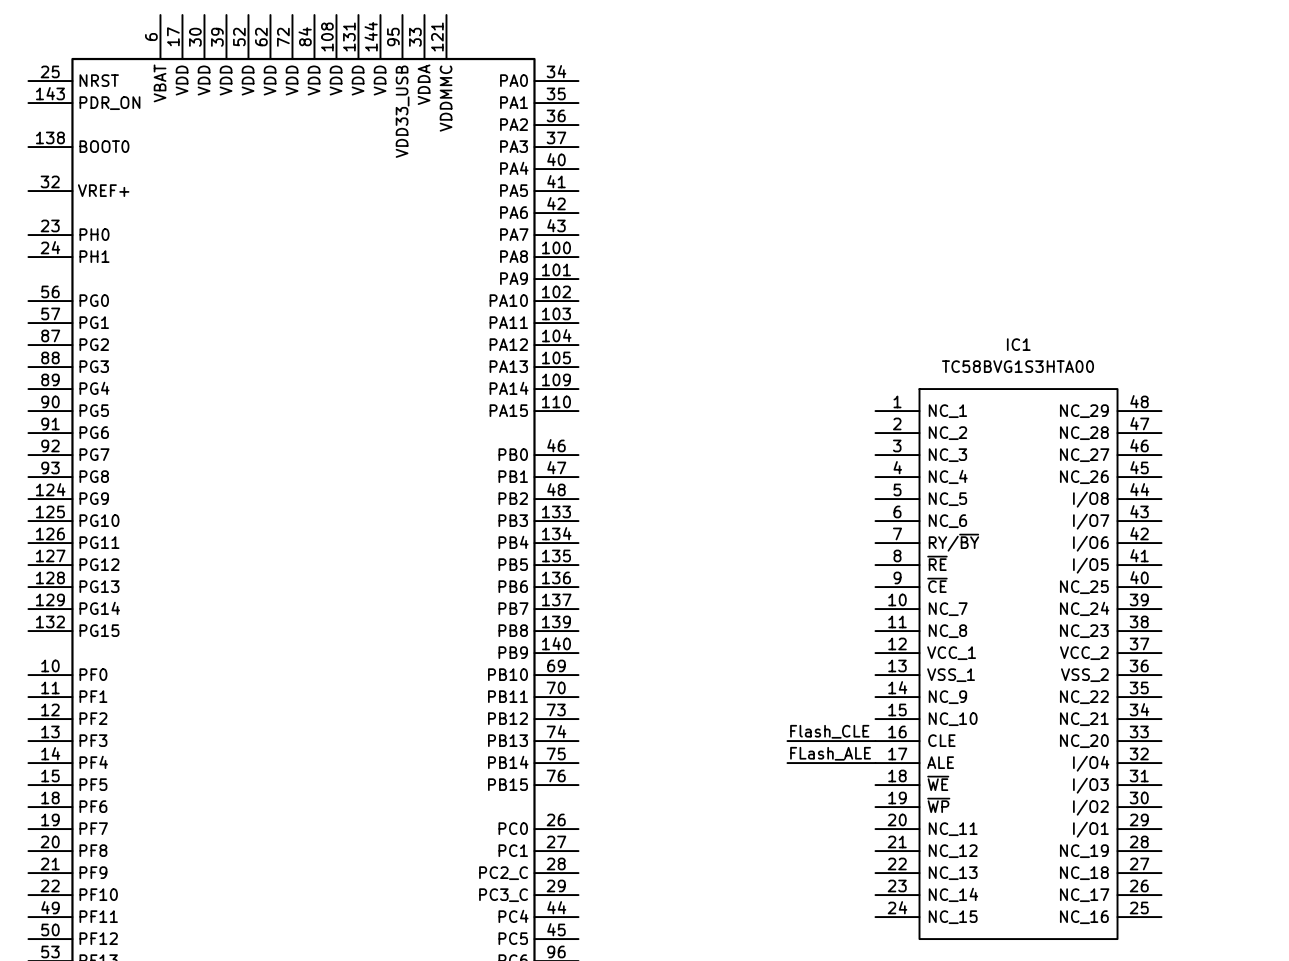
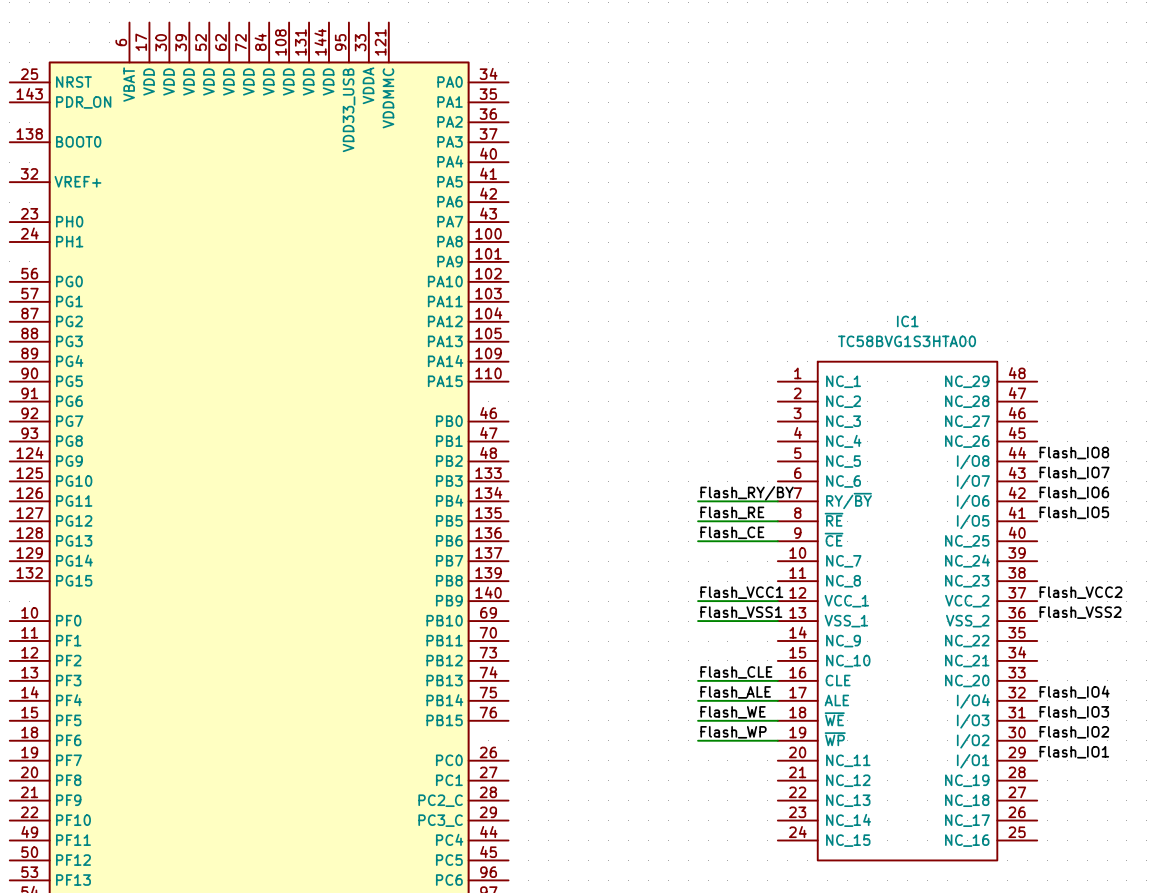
label: none -> Flash_IO8 (1074, 453)
label: none -> Flash_IO7 (1074, 472)
label: none -> Flash_IO6 (1074, 492)
label: none -> Flash_RY/BY (747, 493)
wire: none -> (698, 501) (777, 501)
label: none -> Flash_RE (732, 512)
label: none -> Flash_IO5 (1074, 512)
wire: none -> (698, 521) (777, 521)
label: none -> Flash_CE (732, 532)
wire: none -> (698, 541) (777, 541)
label: none -> Flash_VCC1 (741, 592)
label: none -> Flash_VCC2 (1080, 592)
wire: none -> (698, 601) (777, 601)
label: none -> Flash_VSS1 (741, 612)
label: none -> Flash_VSS2 (1080, 612)
wire: none -> (698, 621) (777, 621)
label: FLash_ALE (830, 753) -> Flash_ALE (735, 692)
label: none -> Flash_IO4 (1074, 692)
label: none -> Flash_WE (733, 712)
label: none -> Flash_IO3 (1074, 712)
wire: none -> (698, 720) (777, 720)
label: none -> Flash_WP (733, 732)
label: none -> Flash_IO2 (1074, 732)
wire: none -> (698, 740) (777, 740)
label: none -> Flash_IO1 (1074, 752)

